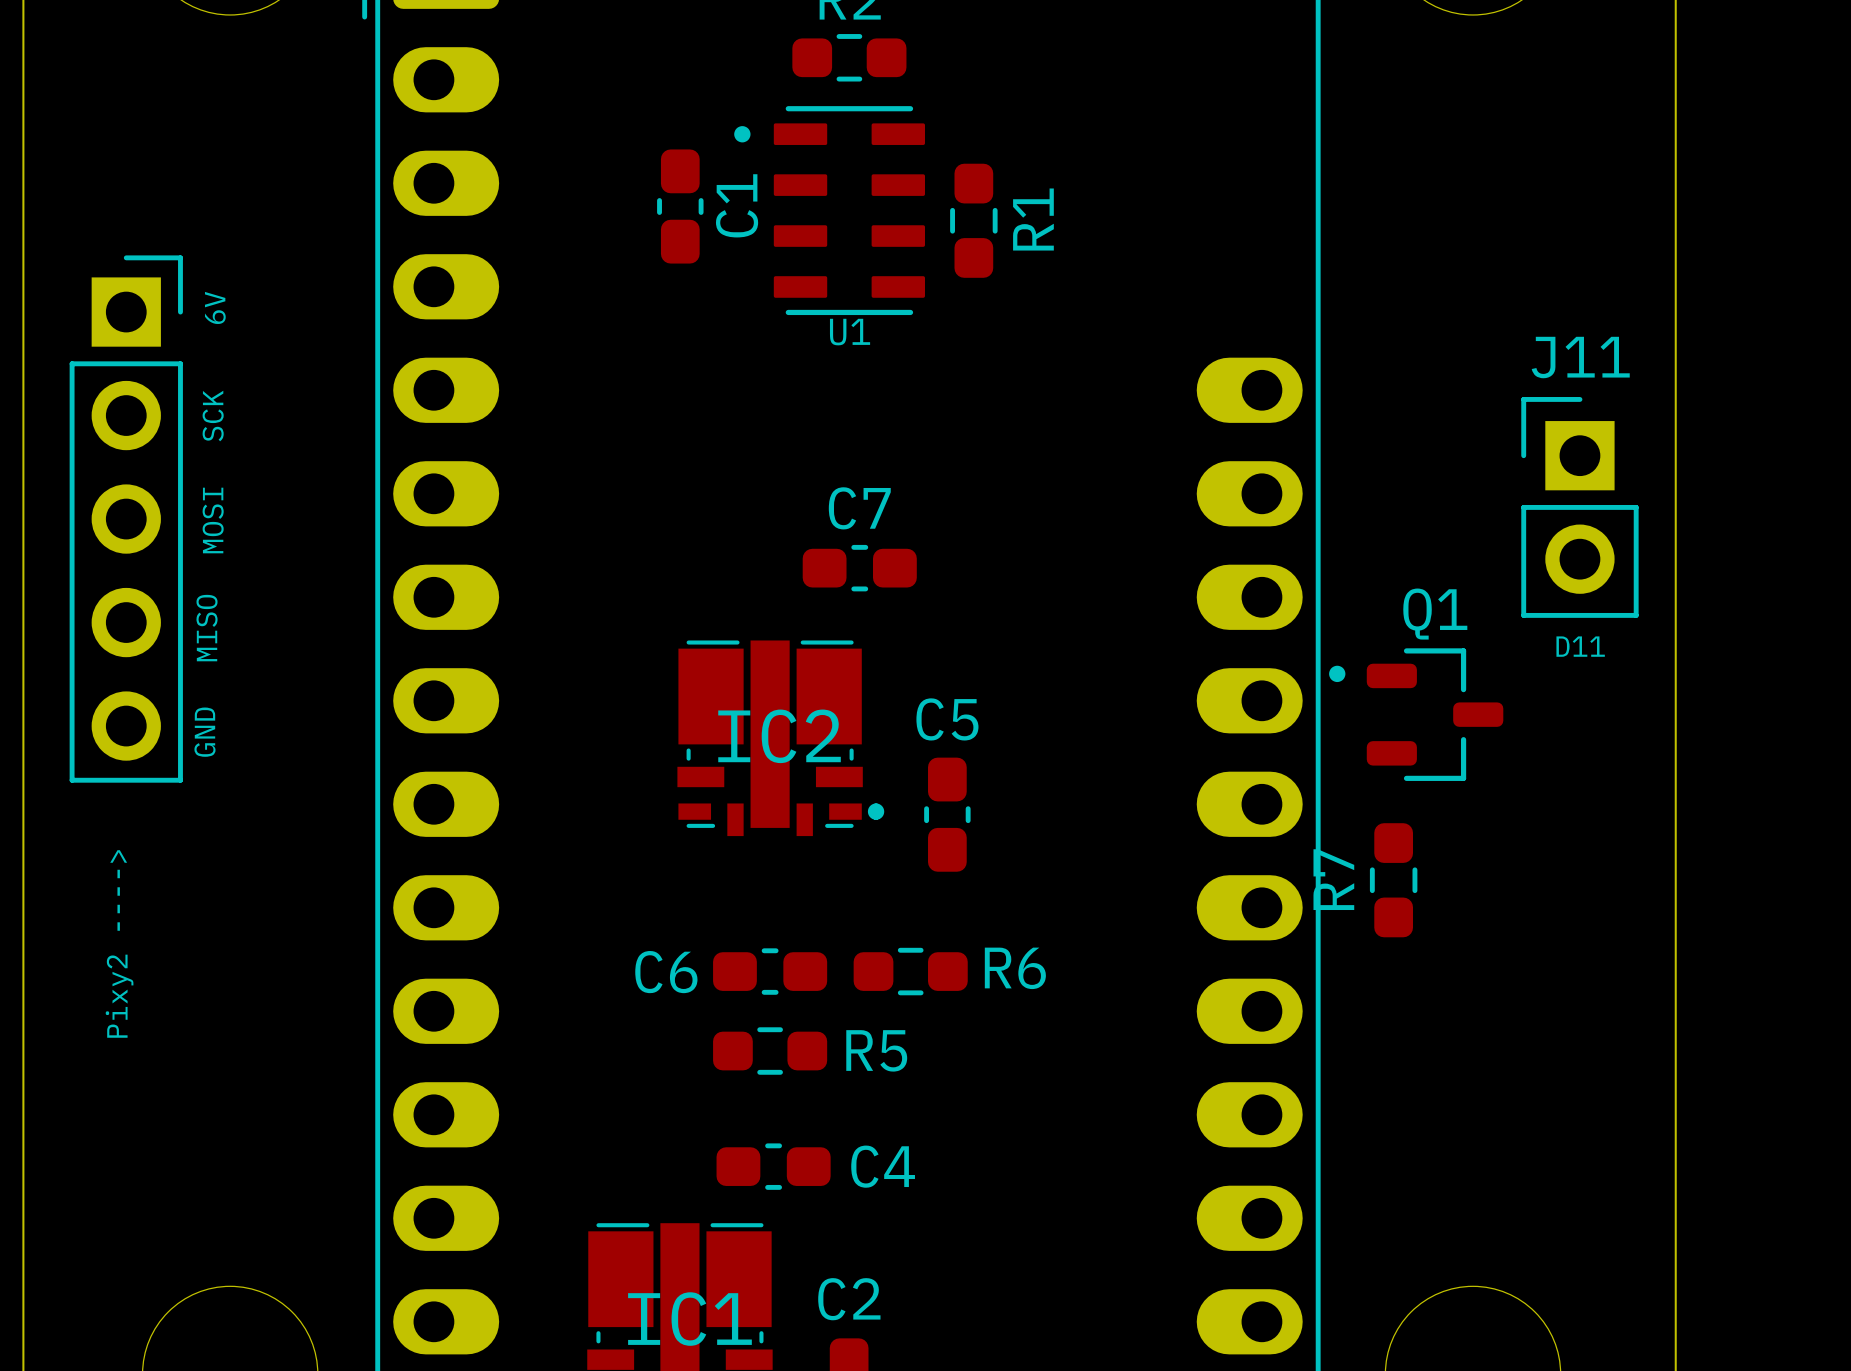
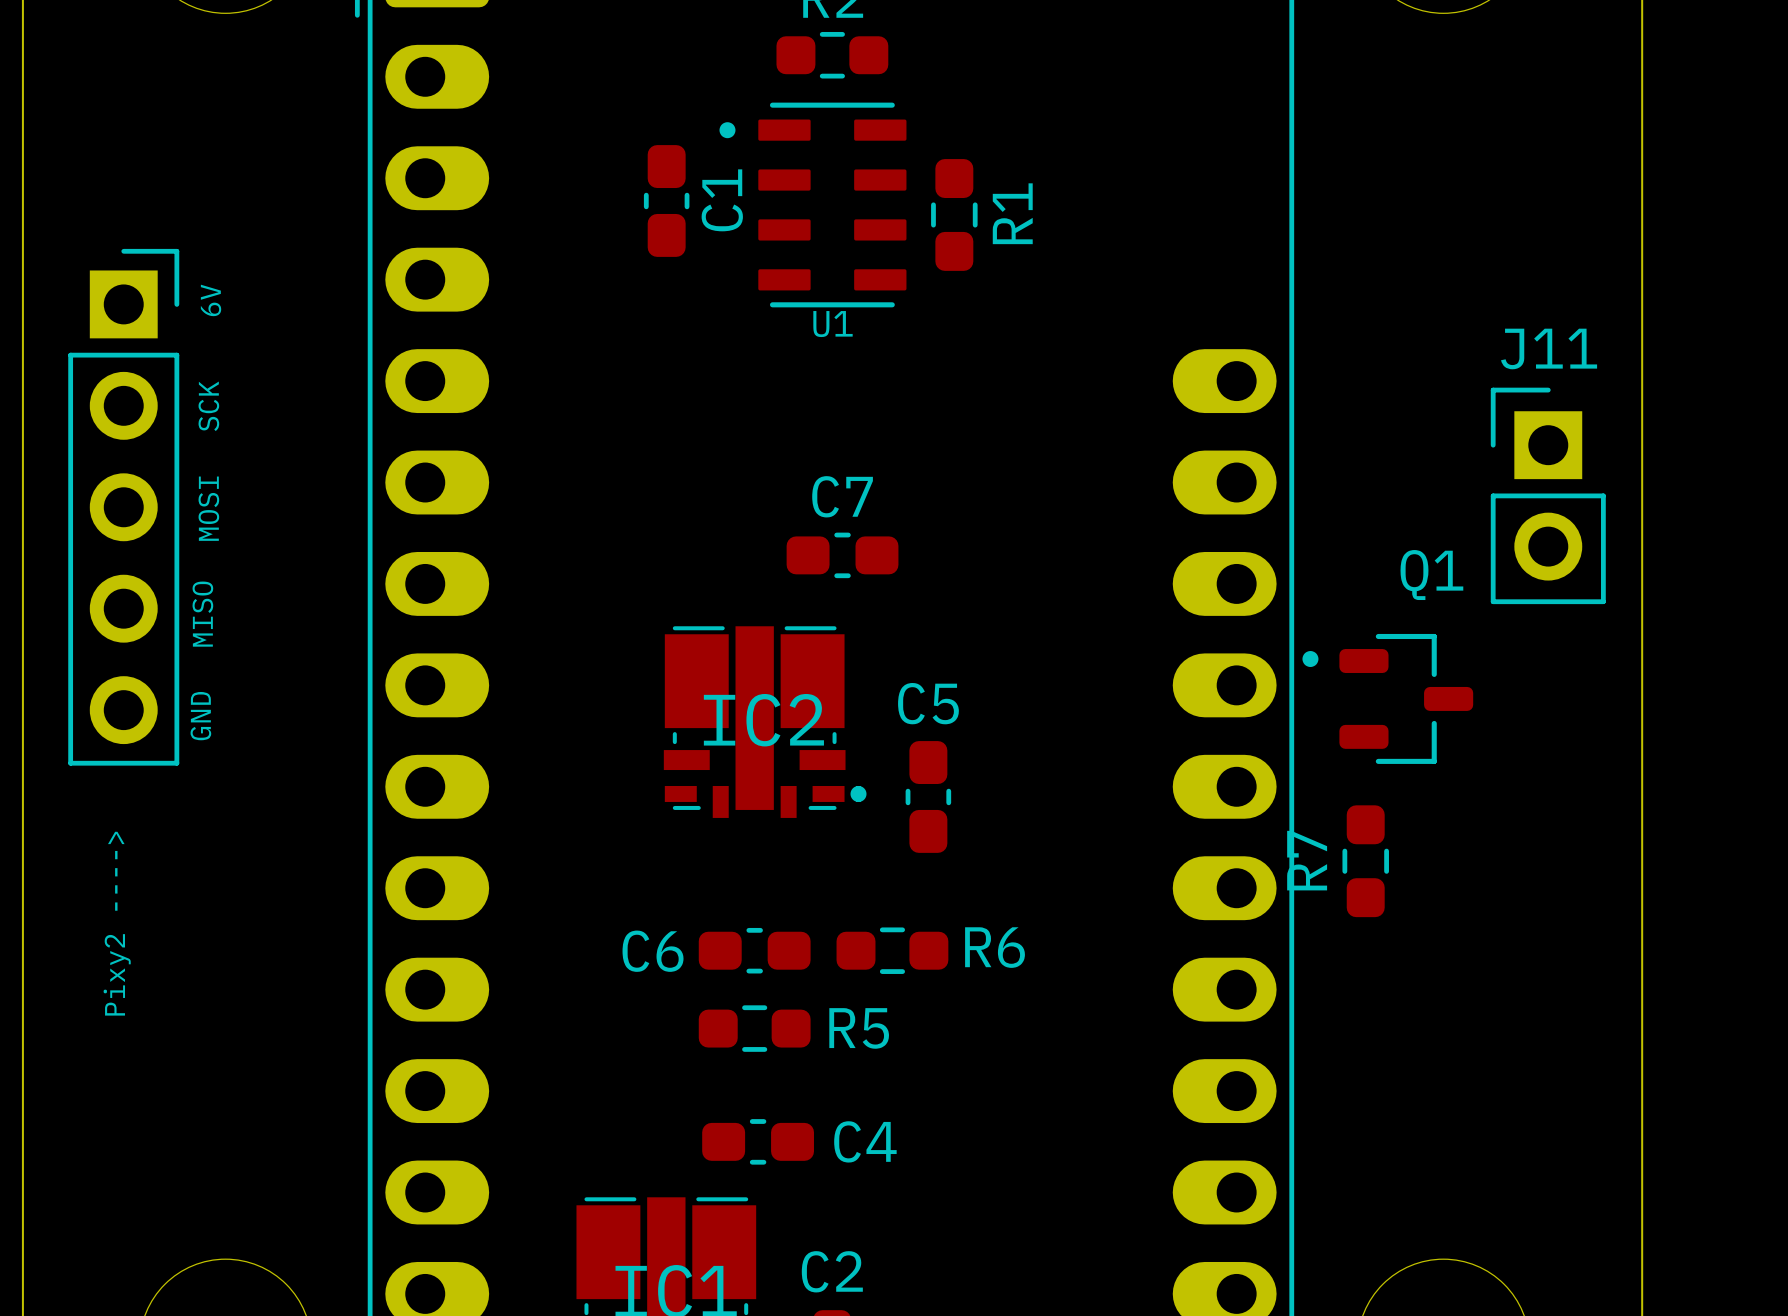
Q1 name position: Q1 (1435, 614) -> Q1 (1431, 575)
text: D11 (1580, 646) -> none

